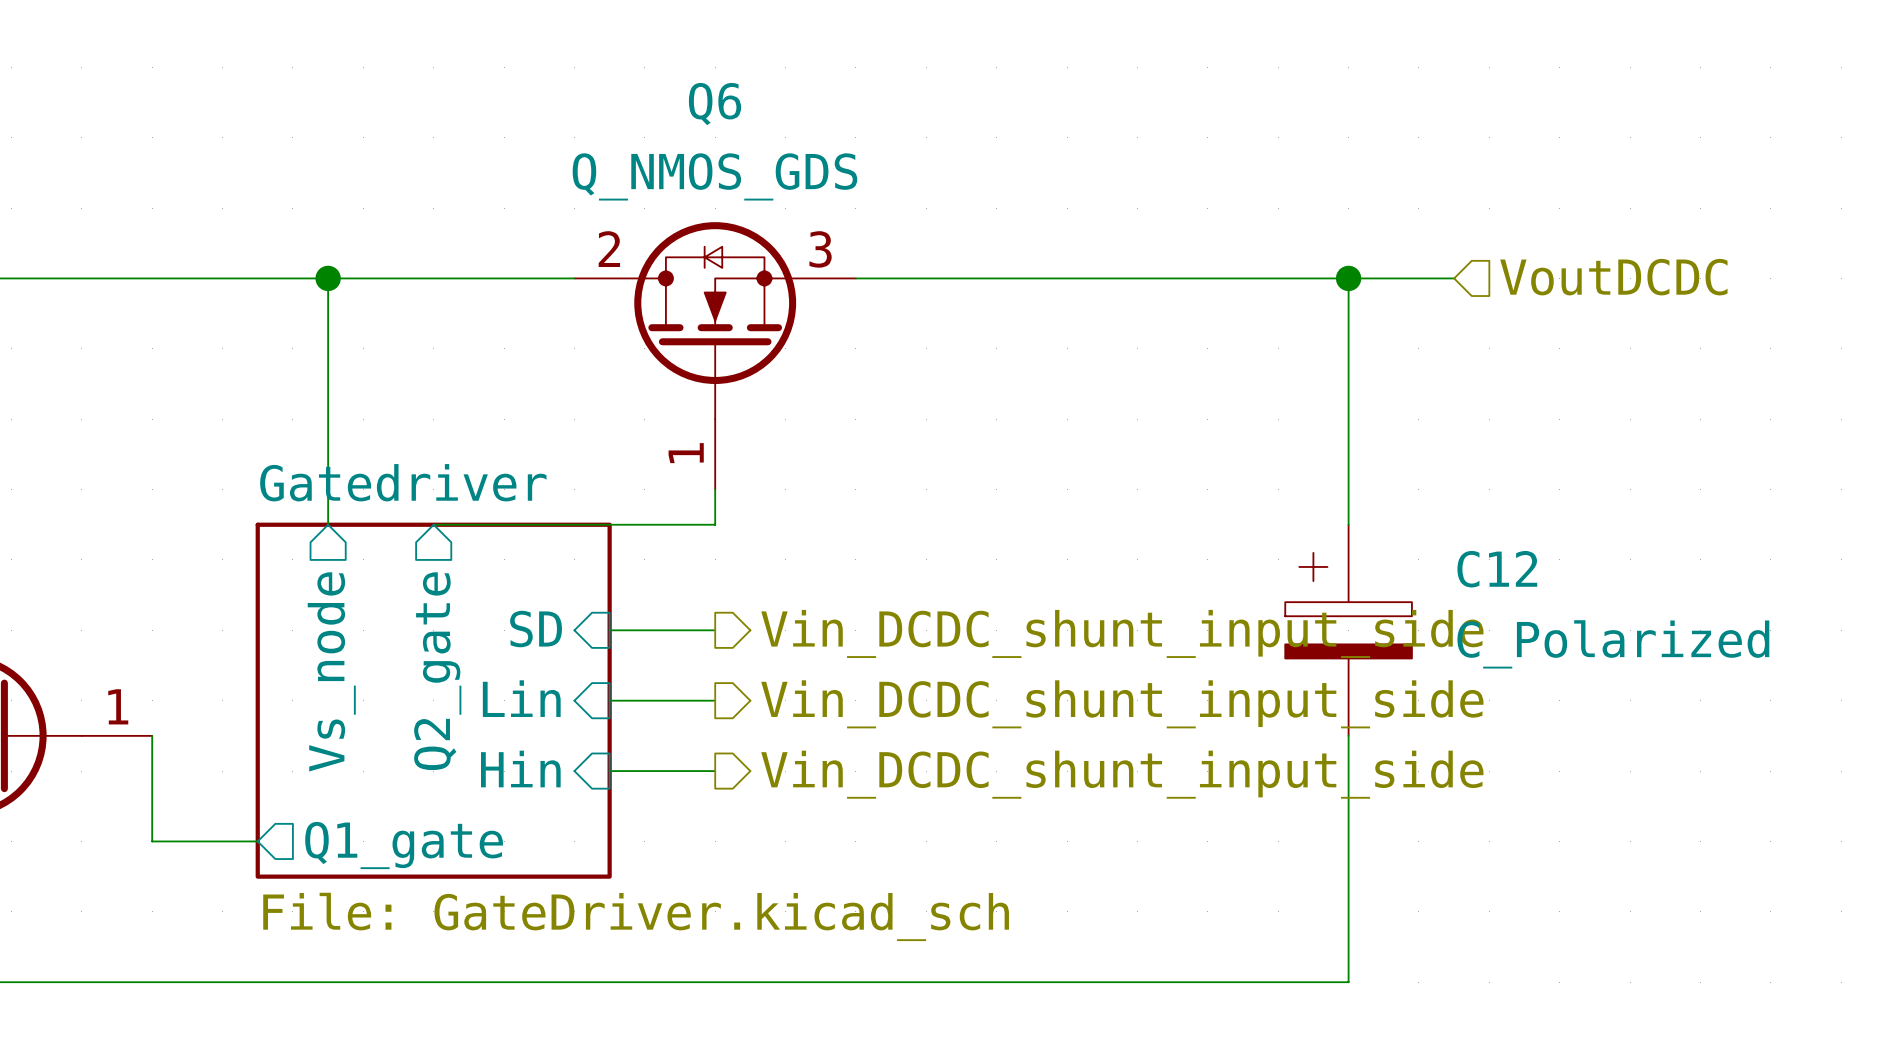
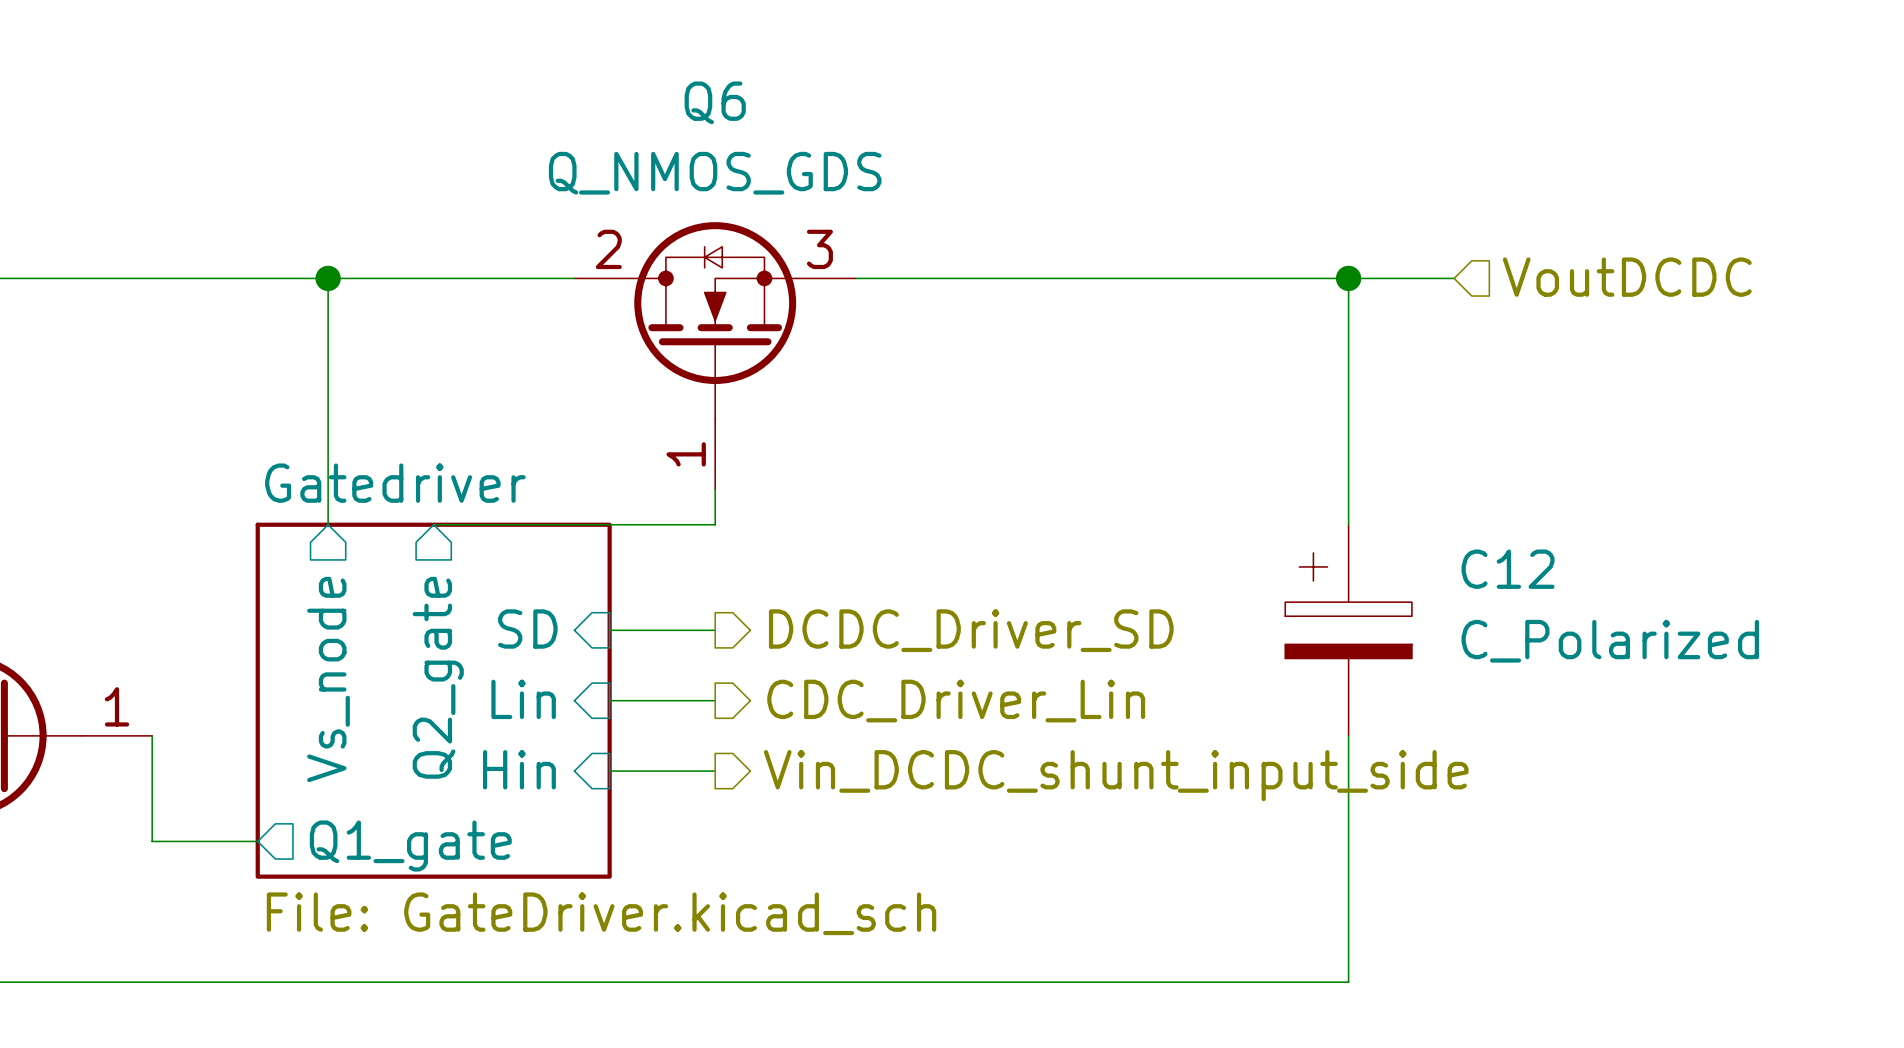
hierarchical label: Vin_DCDC_shunt_input_side (1122, 633) -> DCDC_Driver_SD (971, 630)
hierarchical label: Vin_DCDC_shunt_input_side (1122, 704) -> CDC_Driver_Lin (956, 701)

